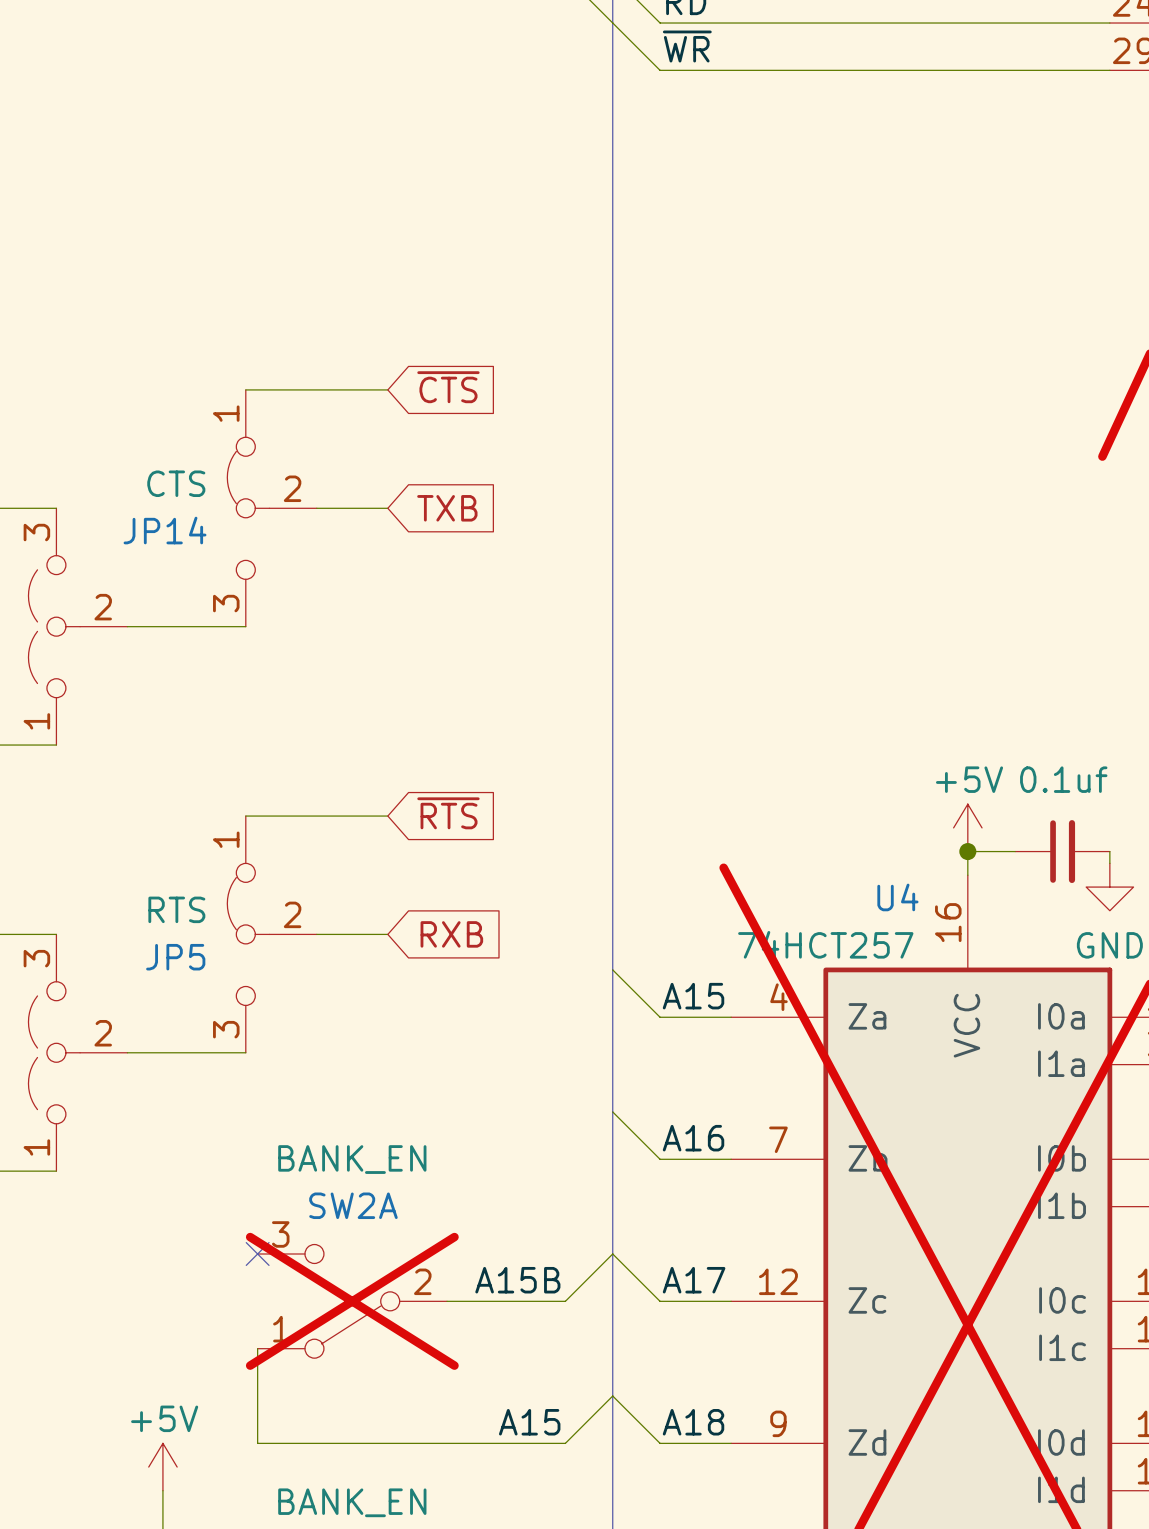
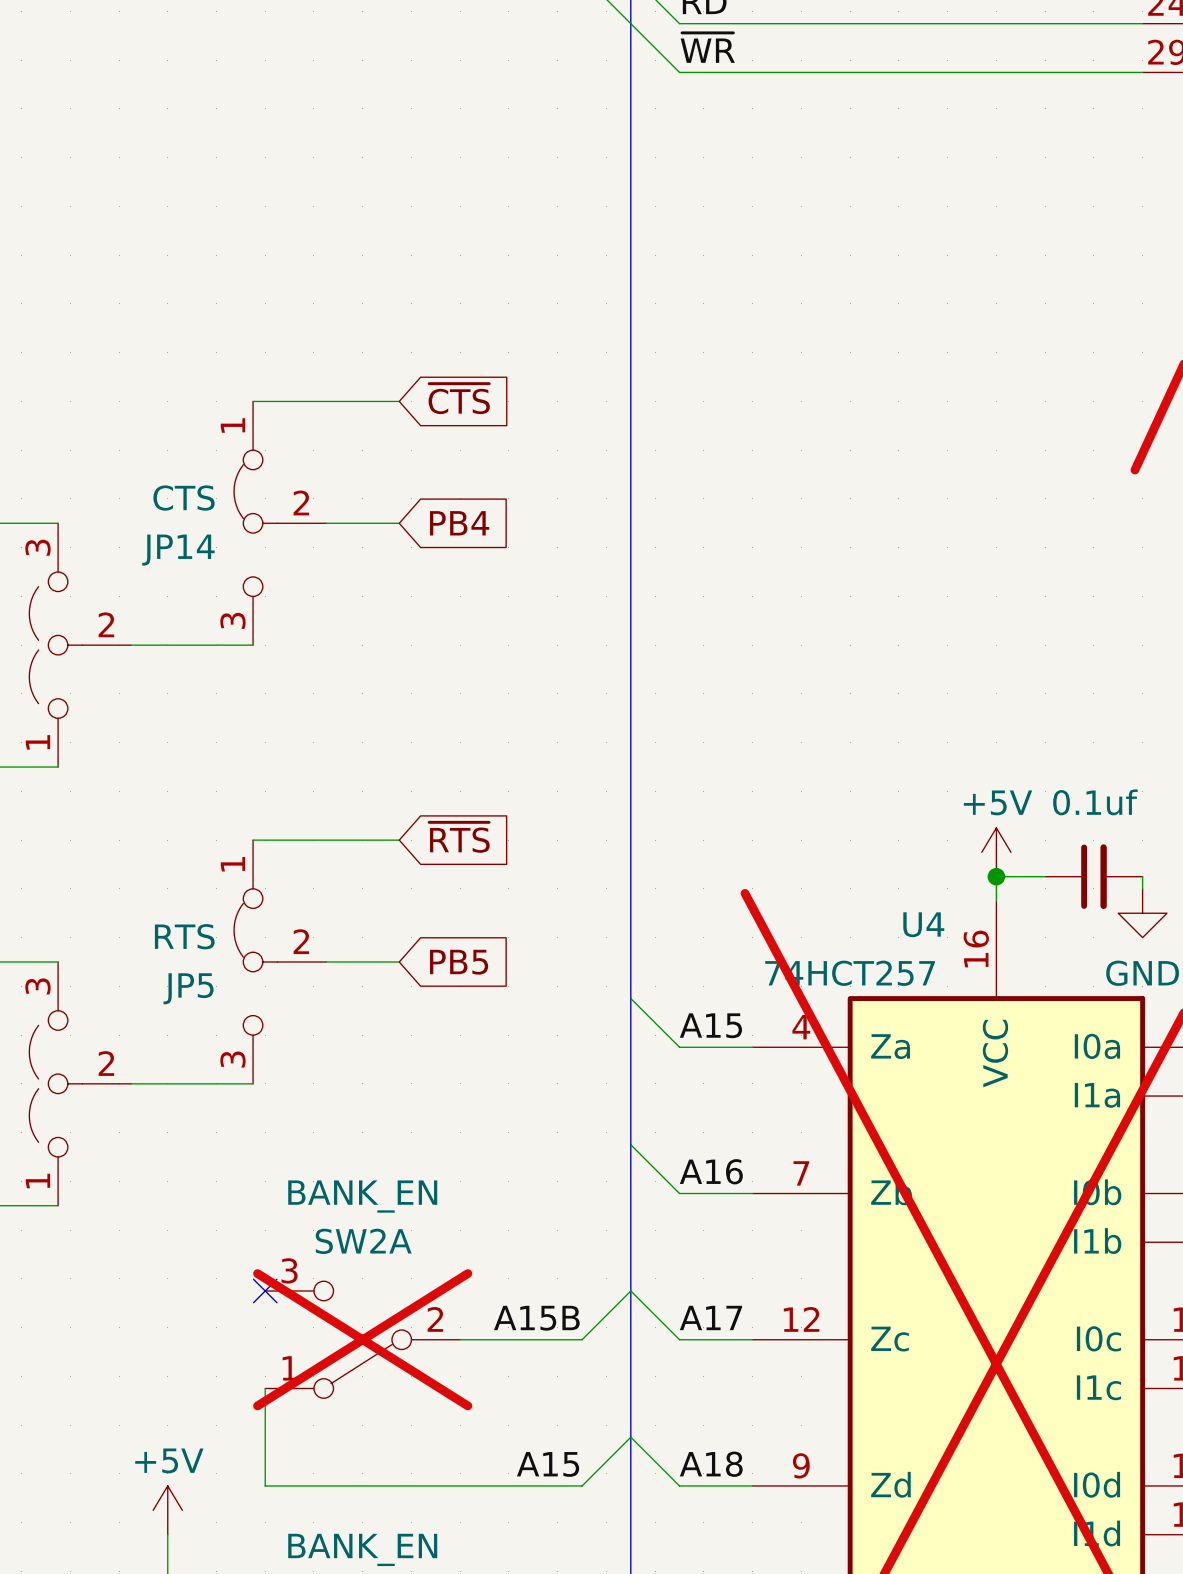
global label: TXB (447, 508) -> PB4 (459, 523)
global label: RXB (451, 934) -> PB5 (459, 962)

